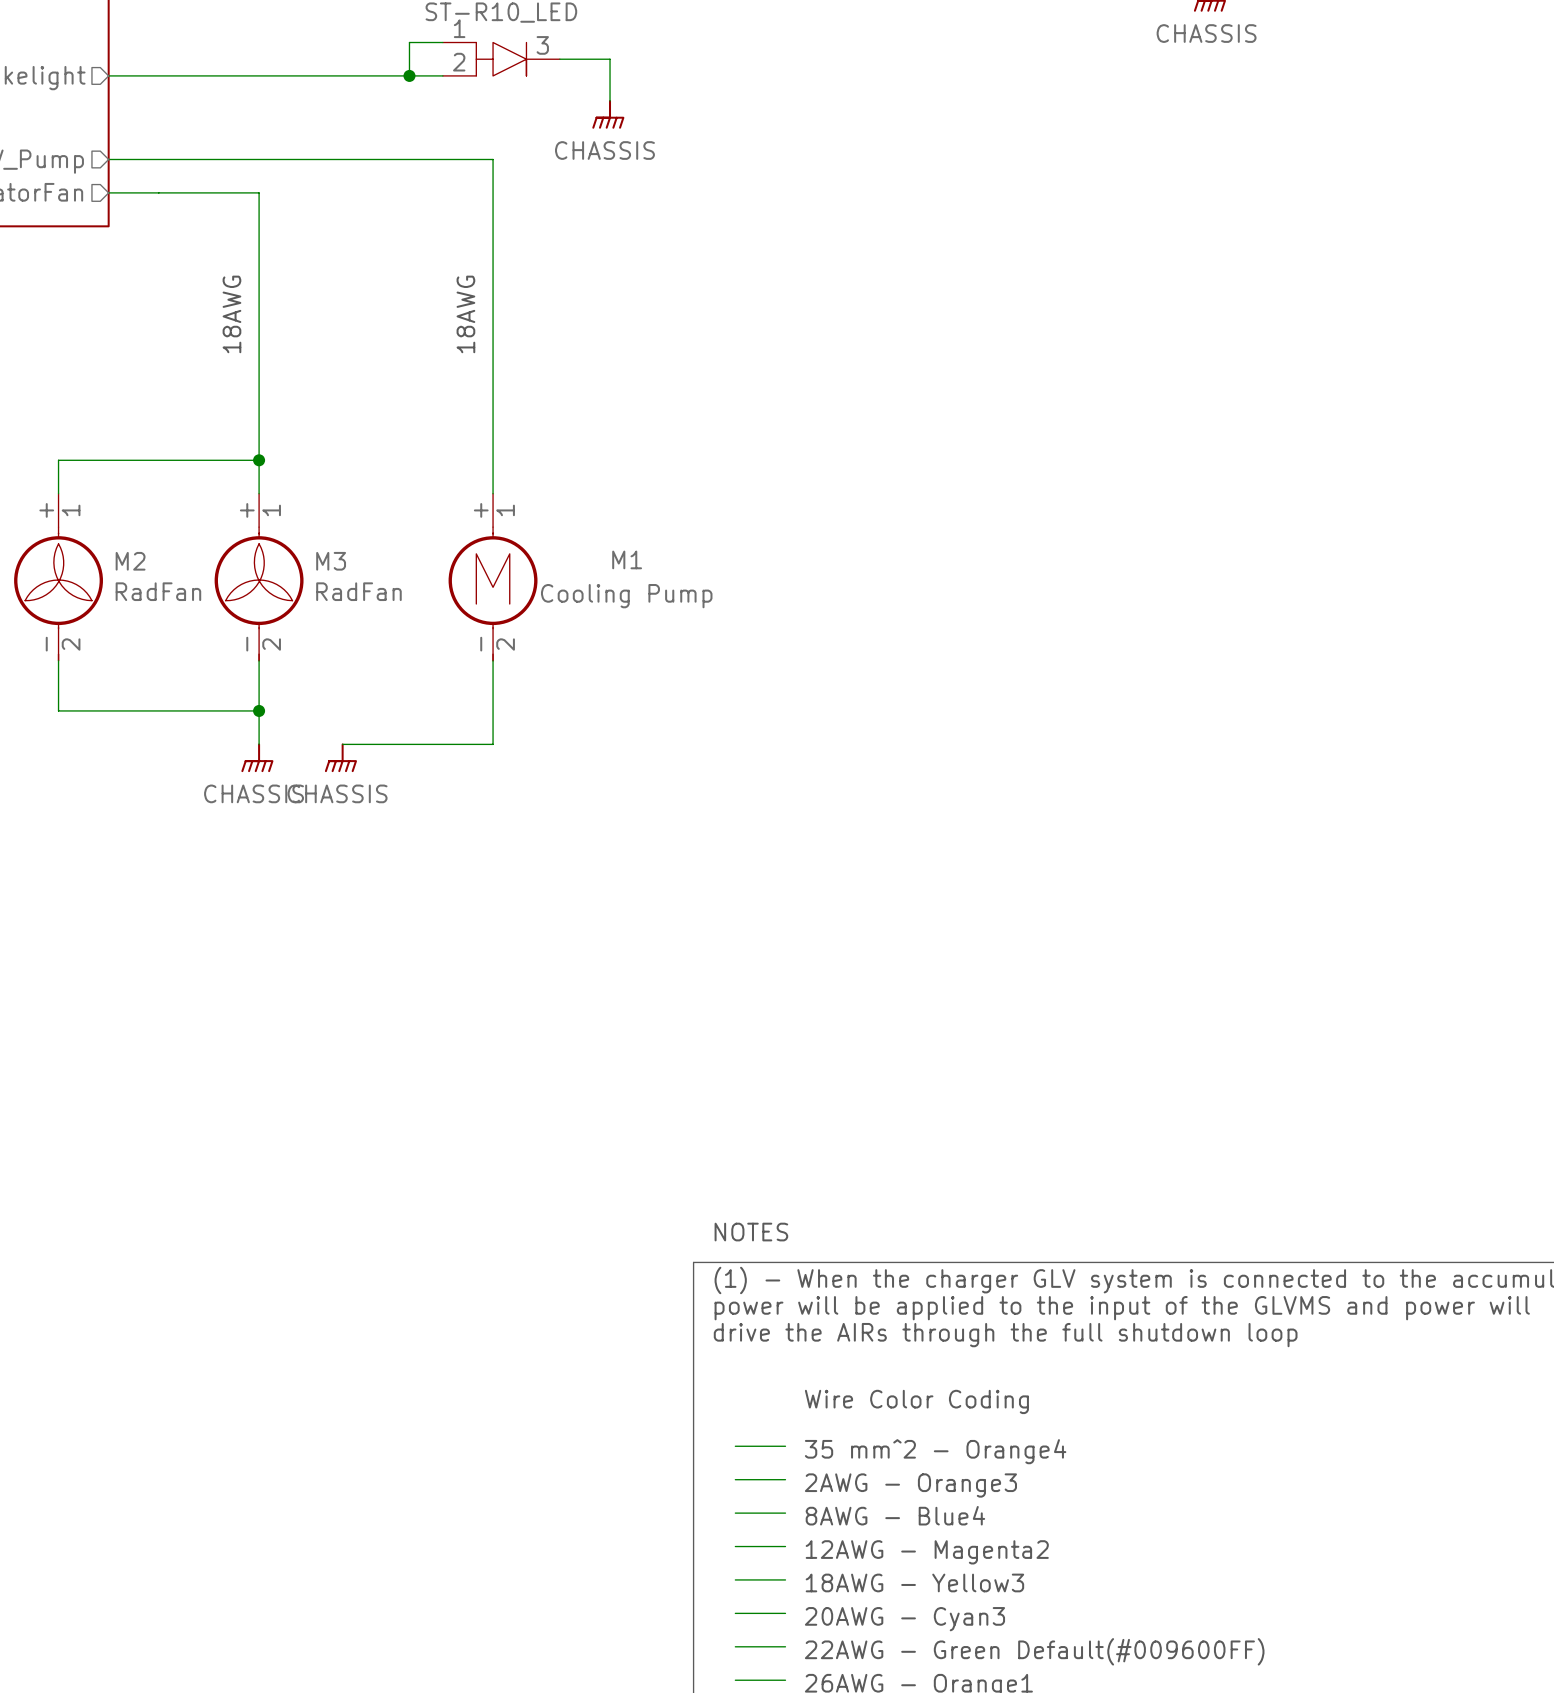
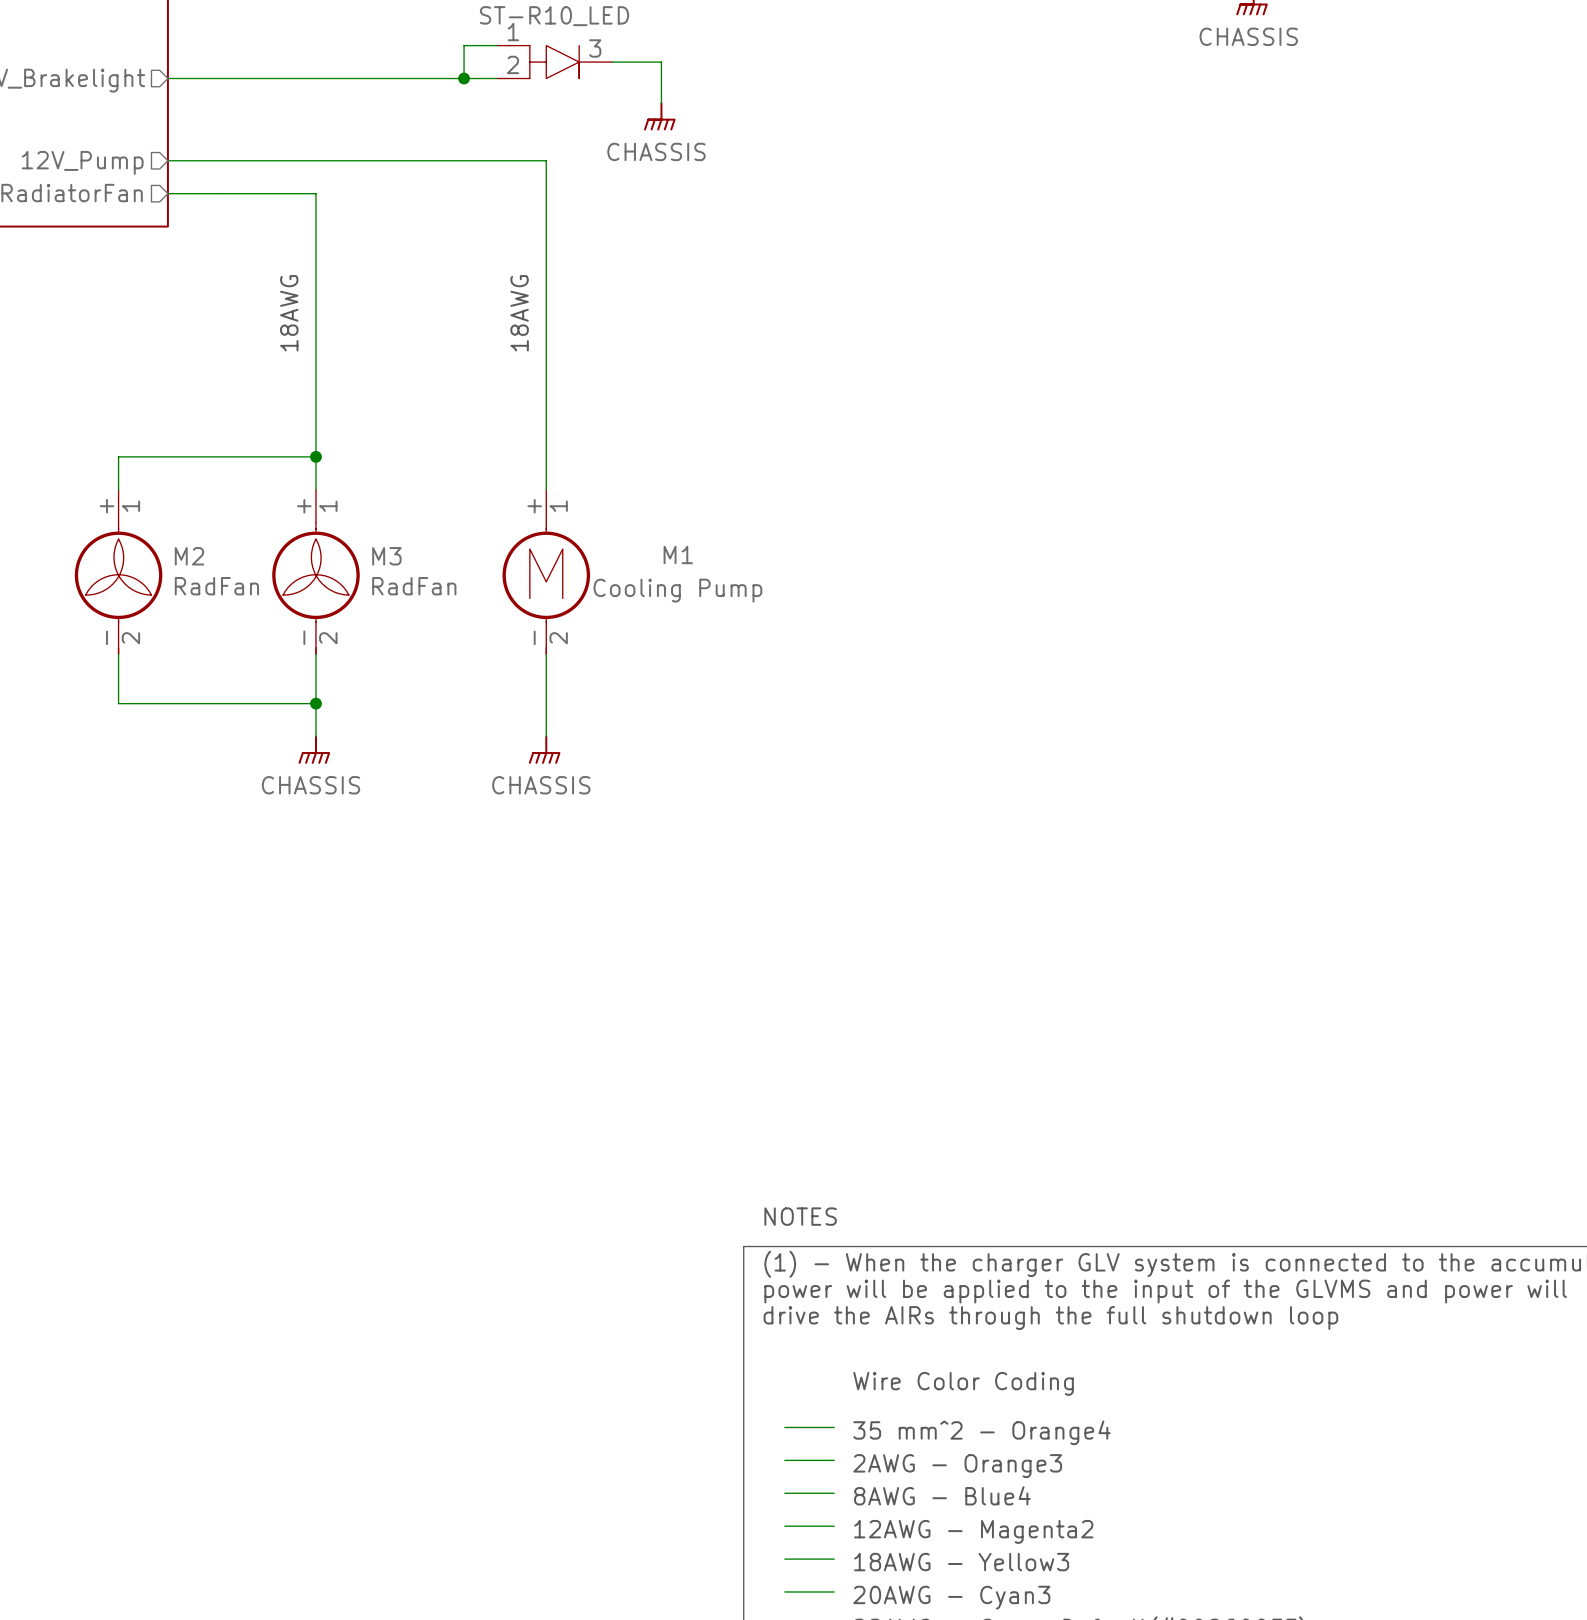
wire: (342, 744) (493, 744) -> none
part position: (340, 757) -> (544, 749)

